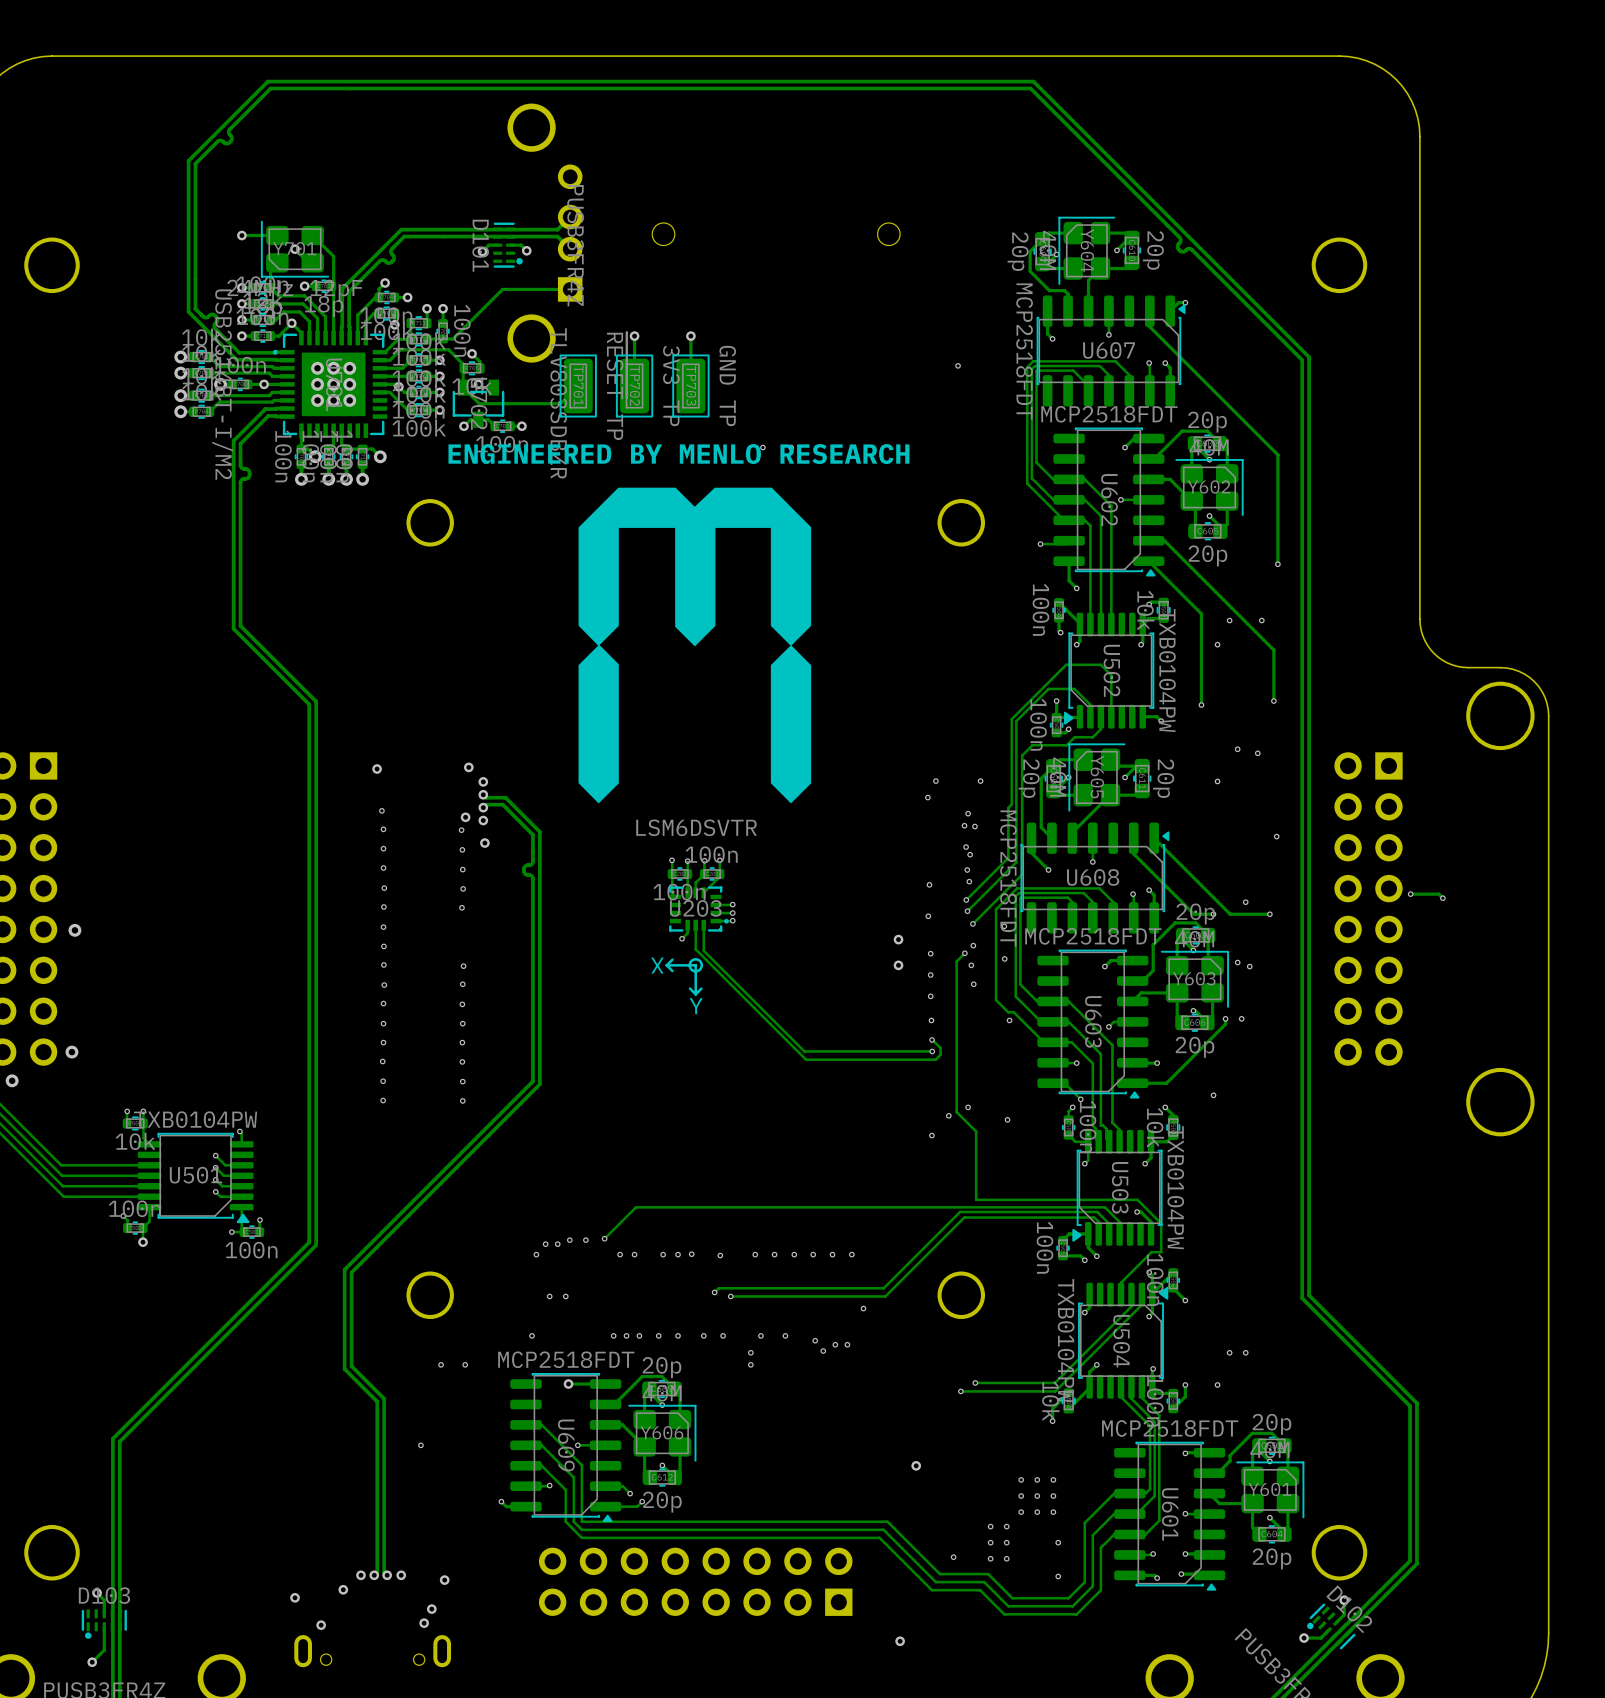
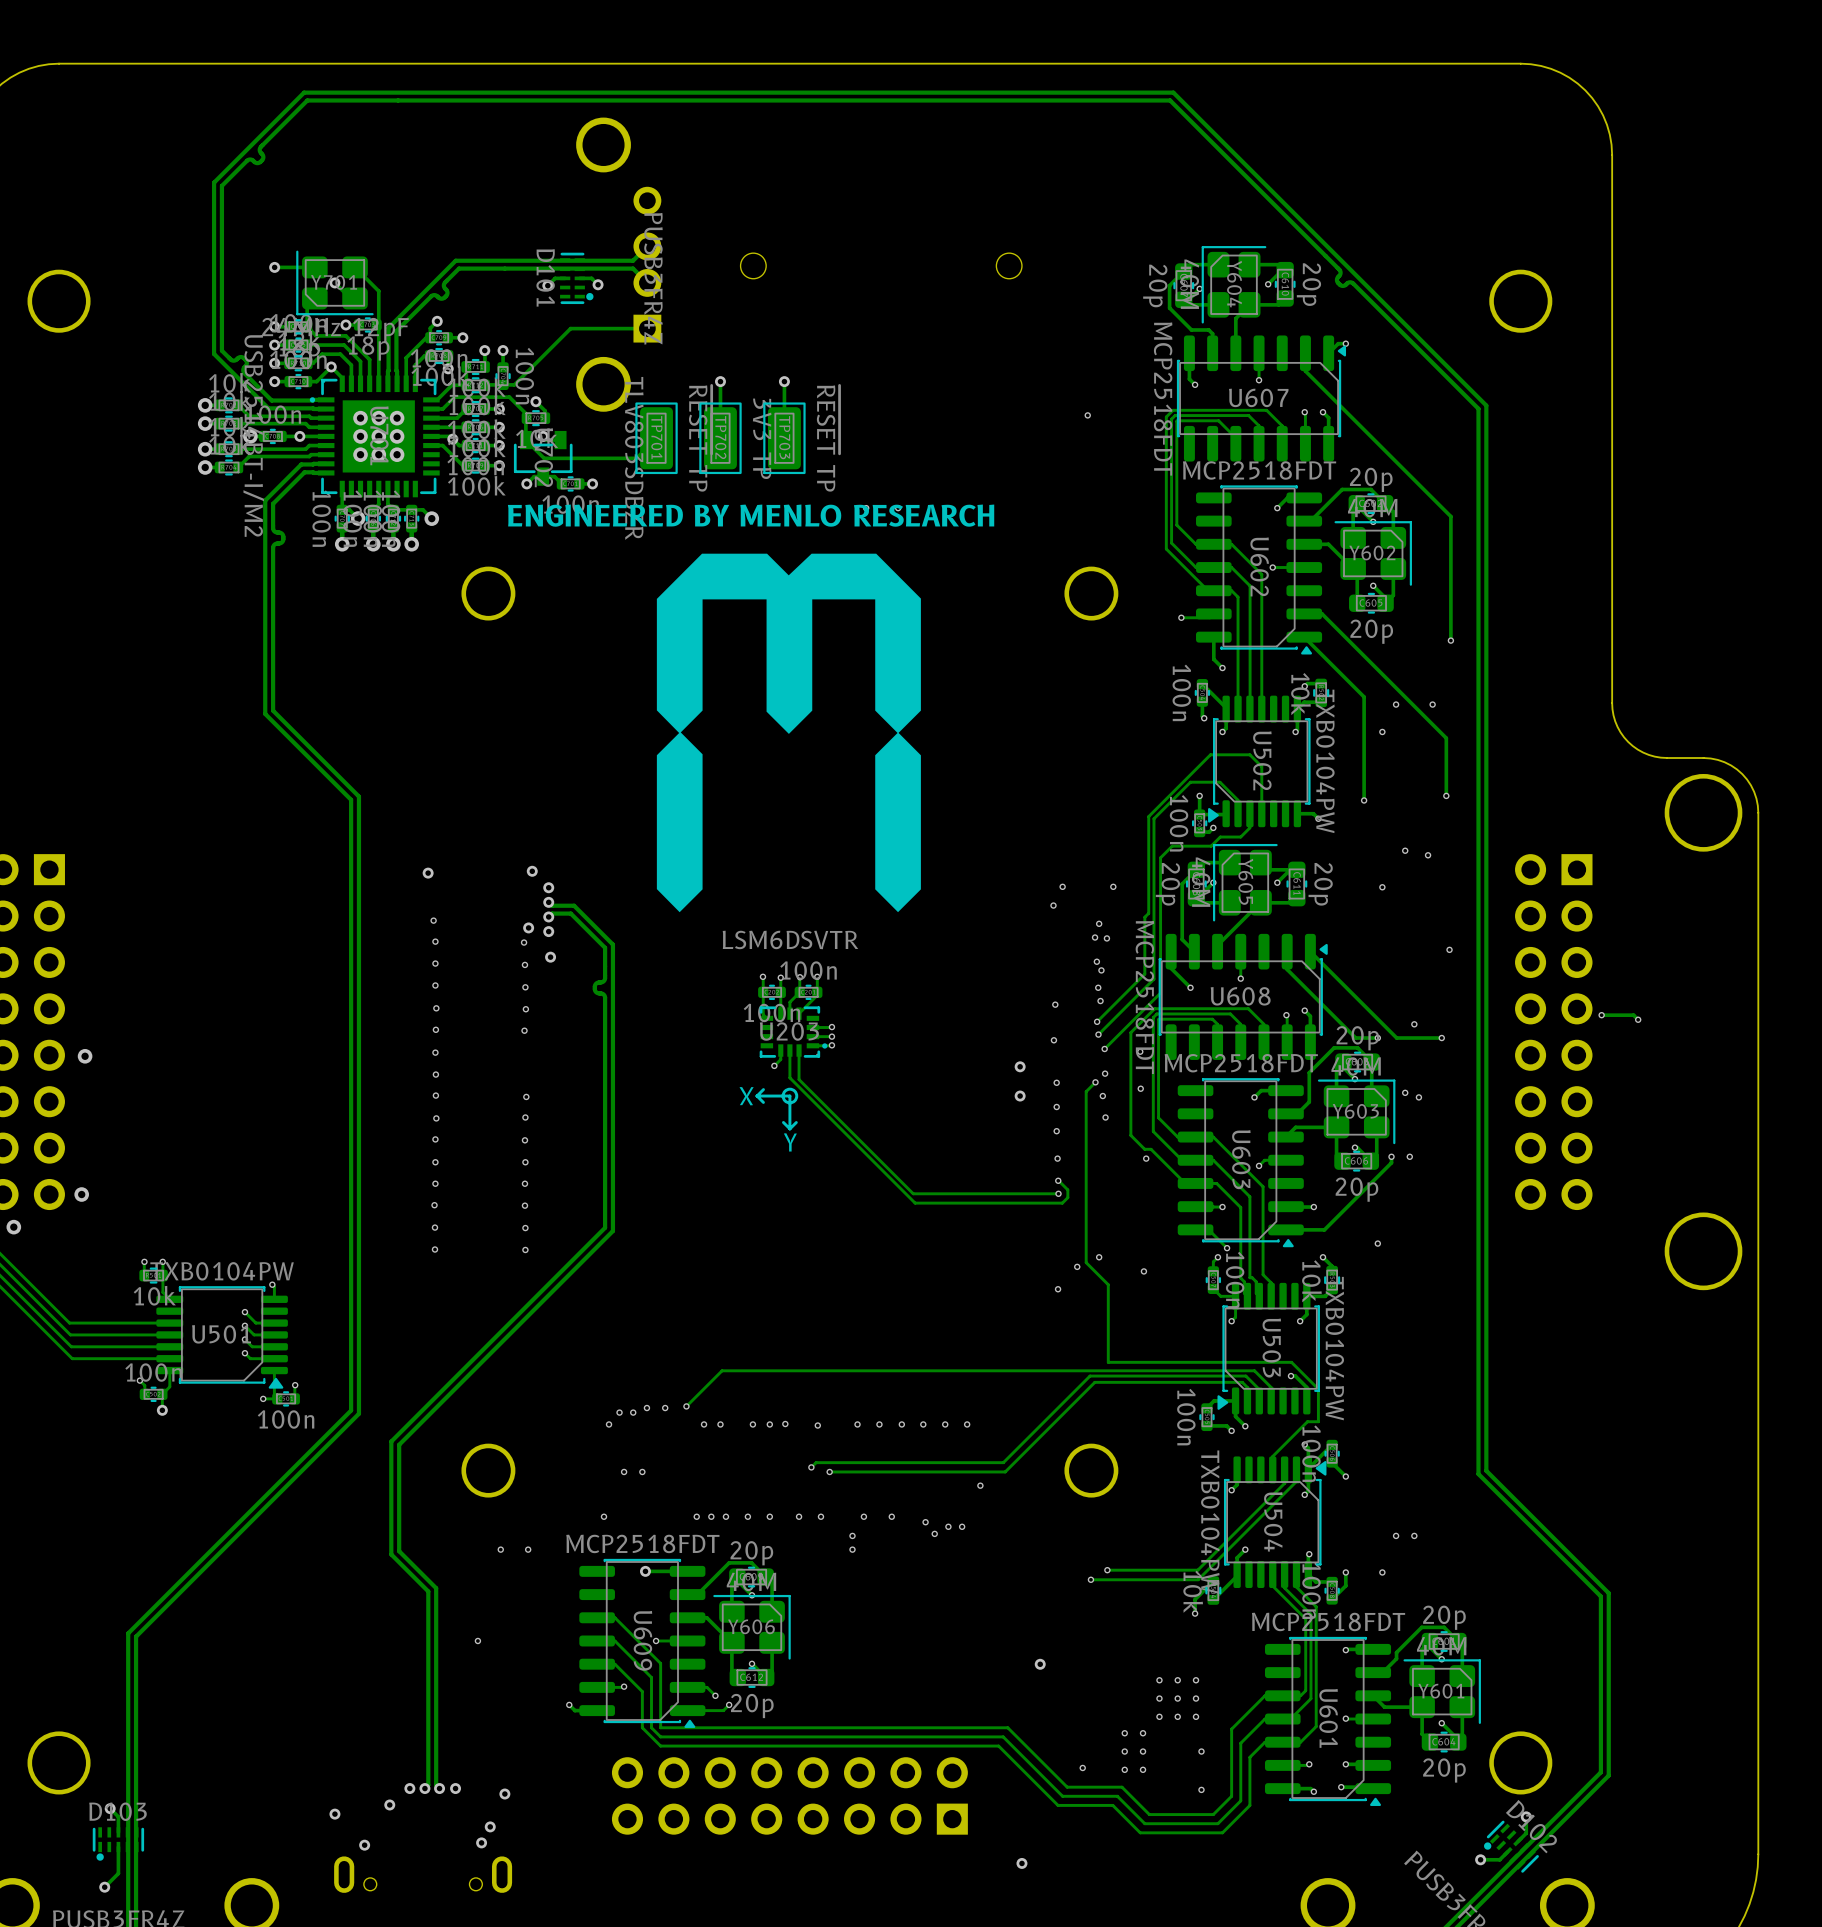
TP703 value: GND TP (727, 385) -> ~{RESET} TP (828, 438)

